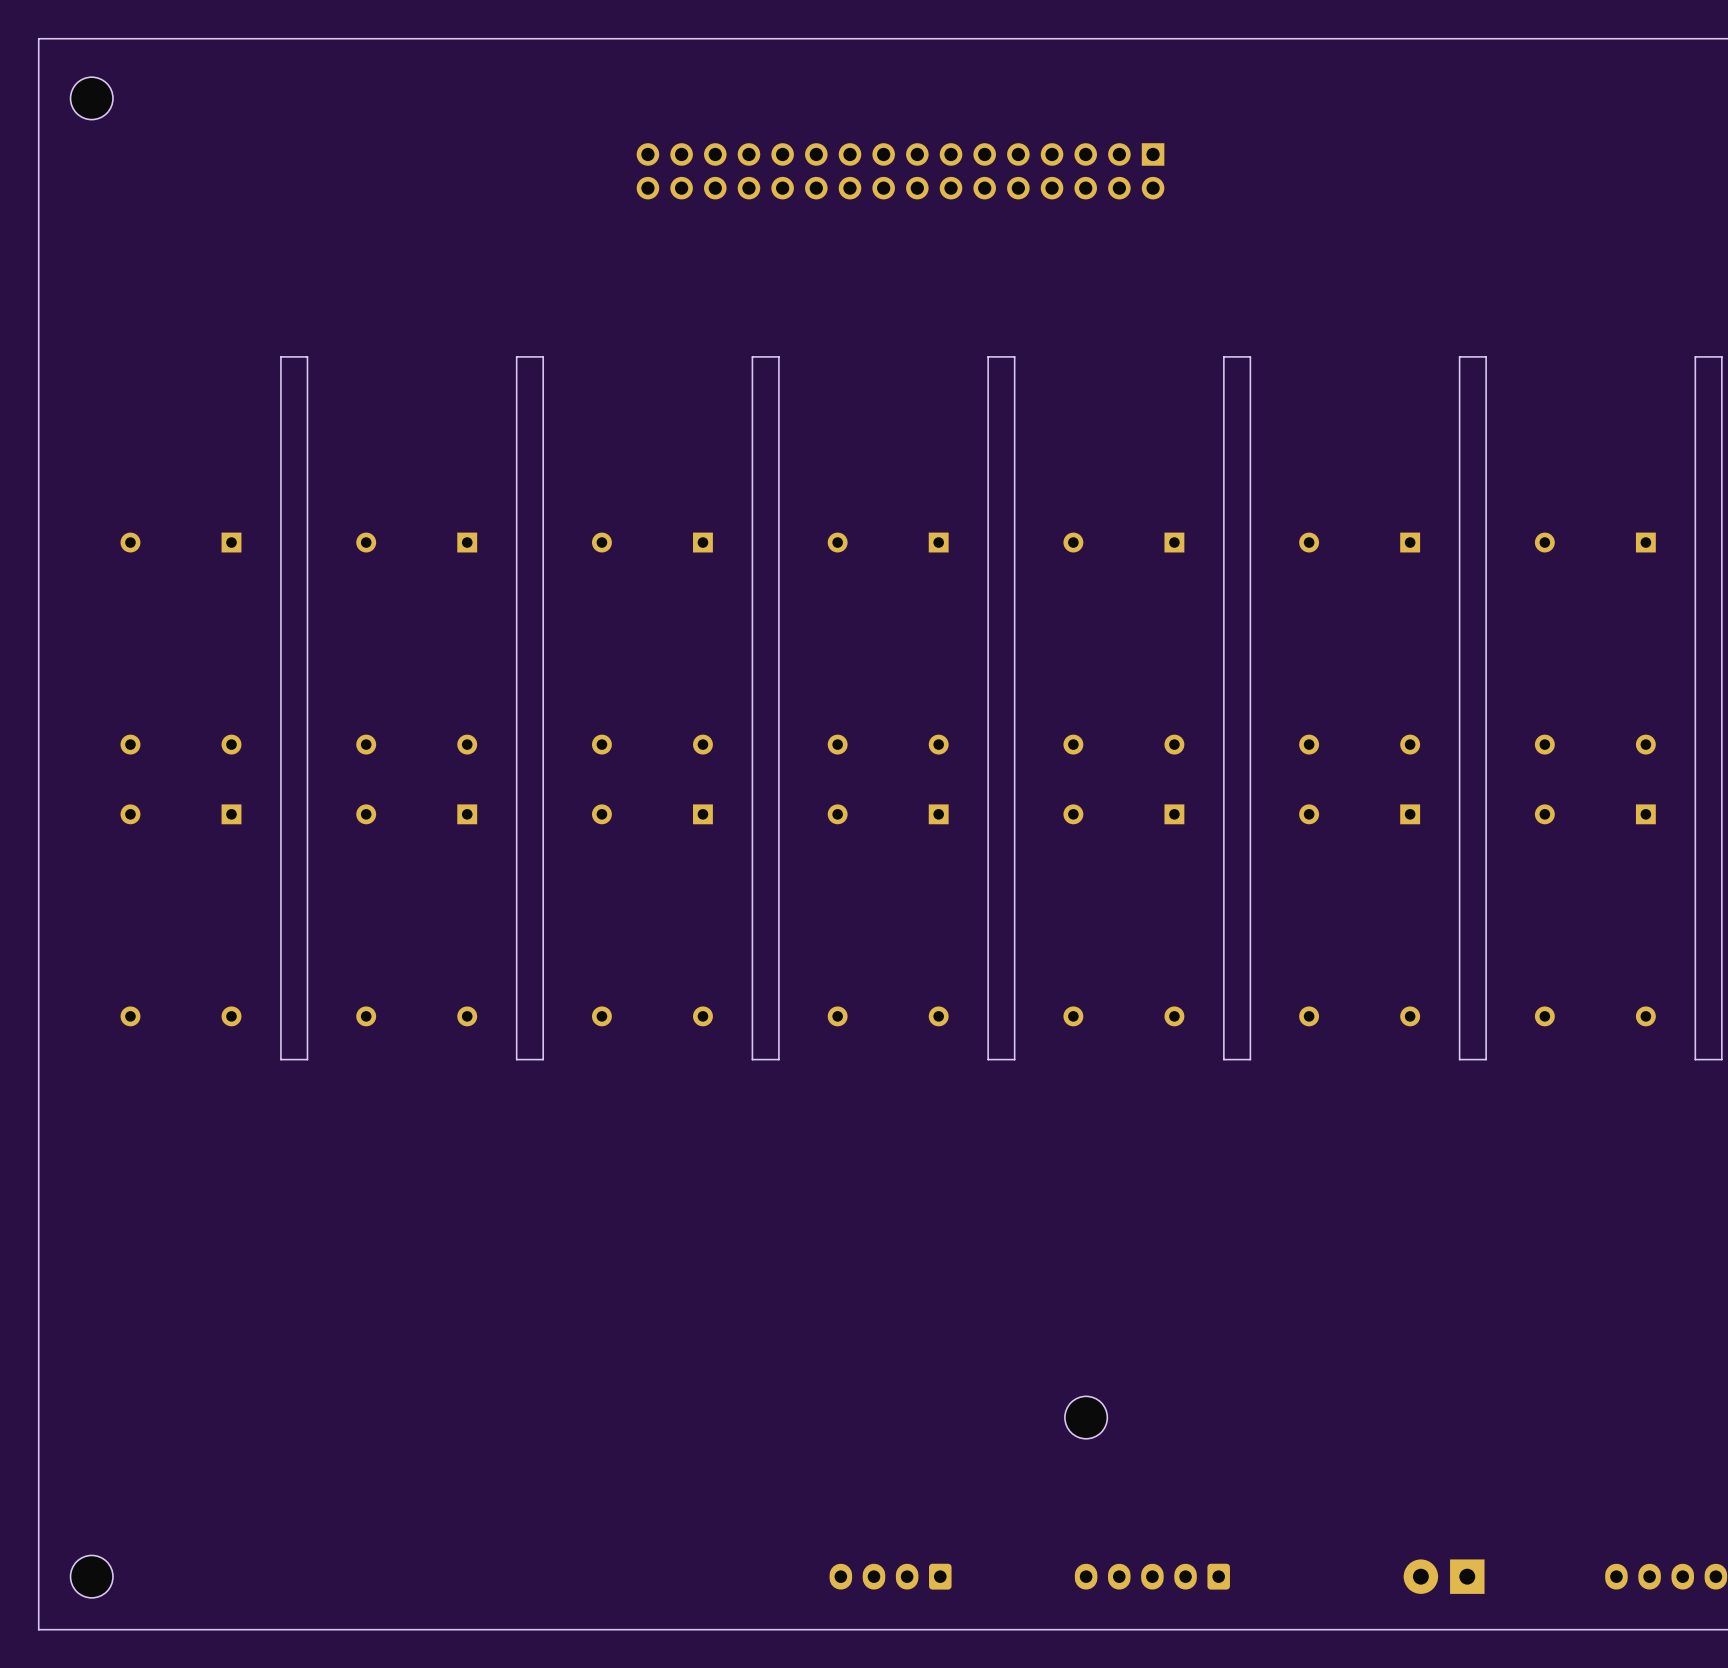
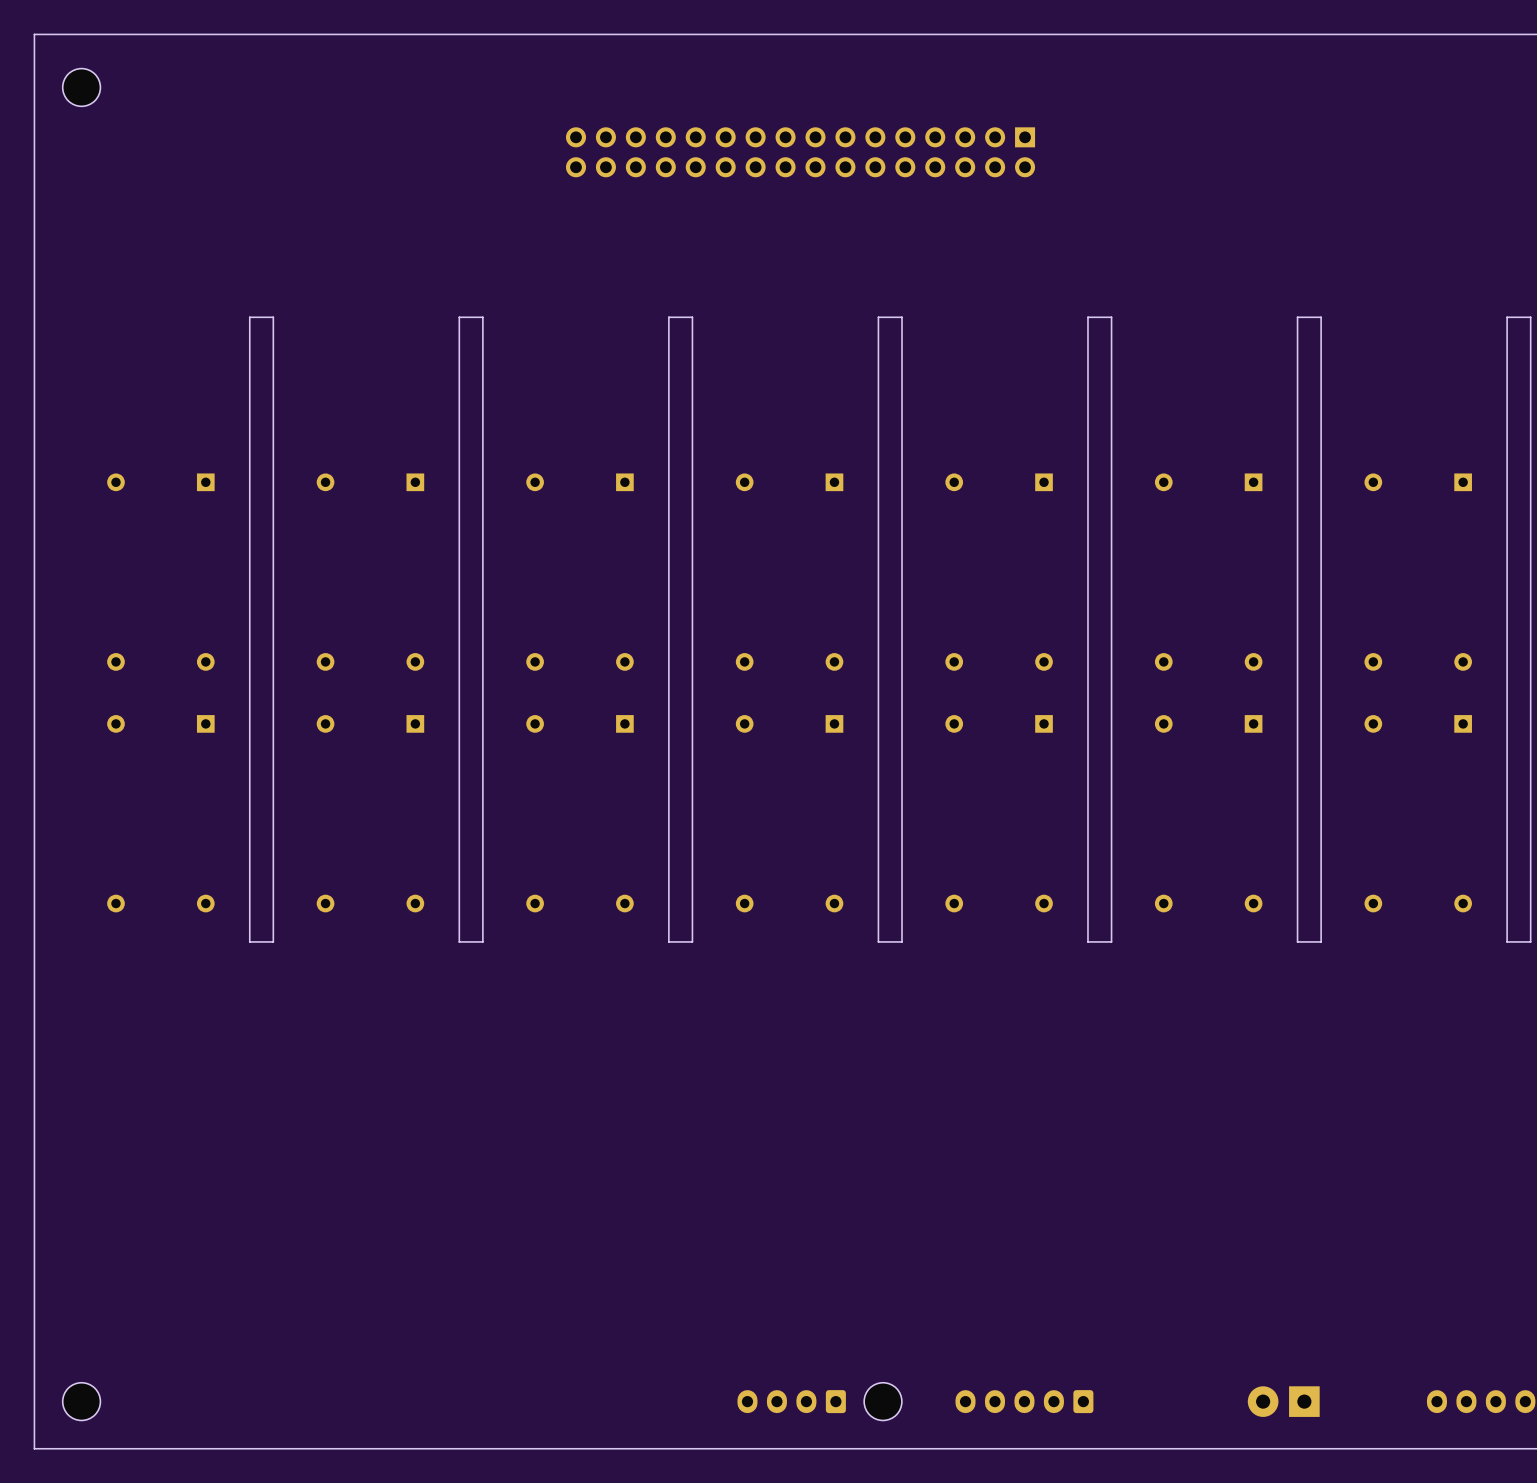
part position: (1086, 1417) -> (883, 1401)

